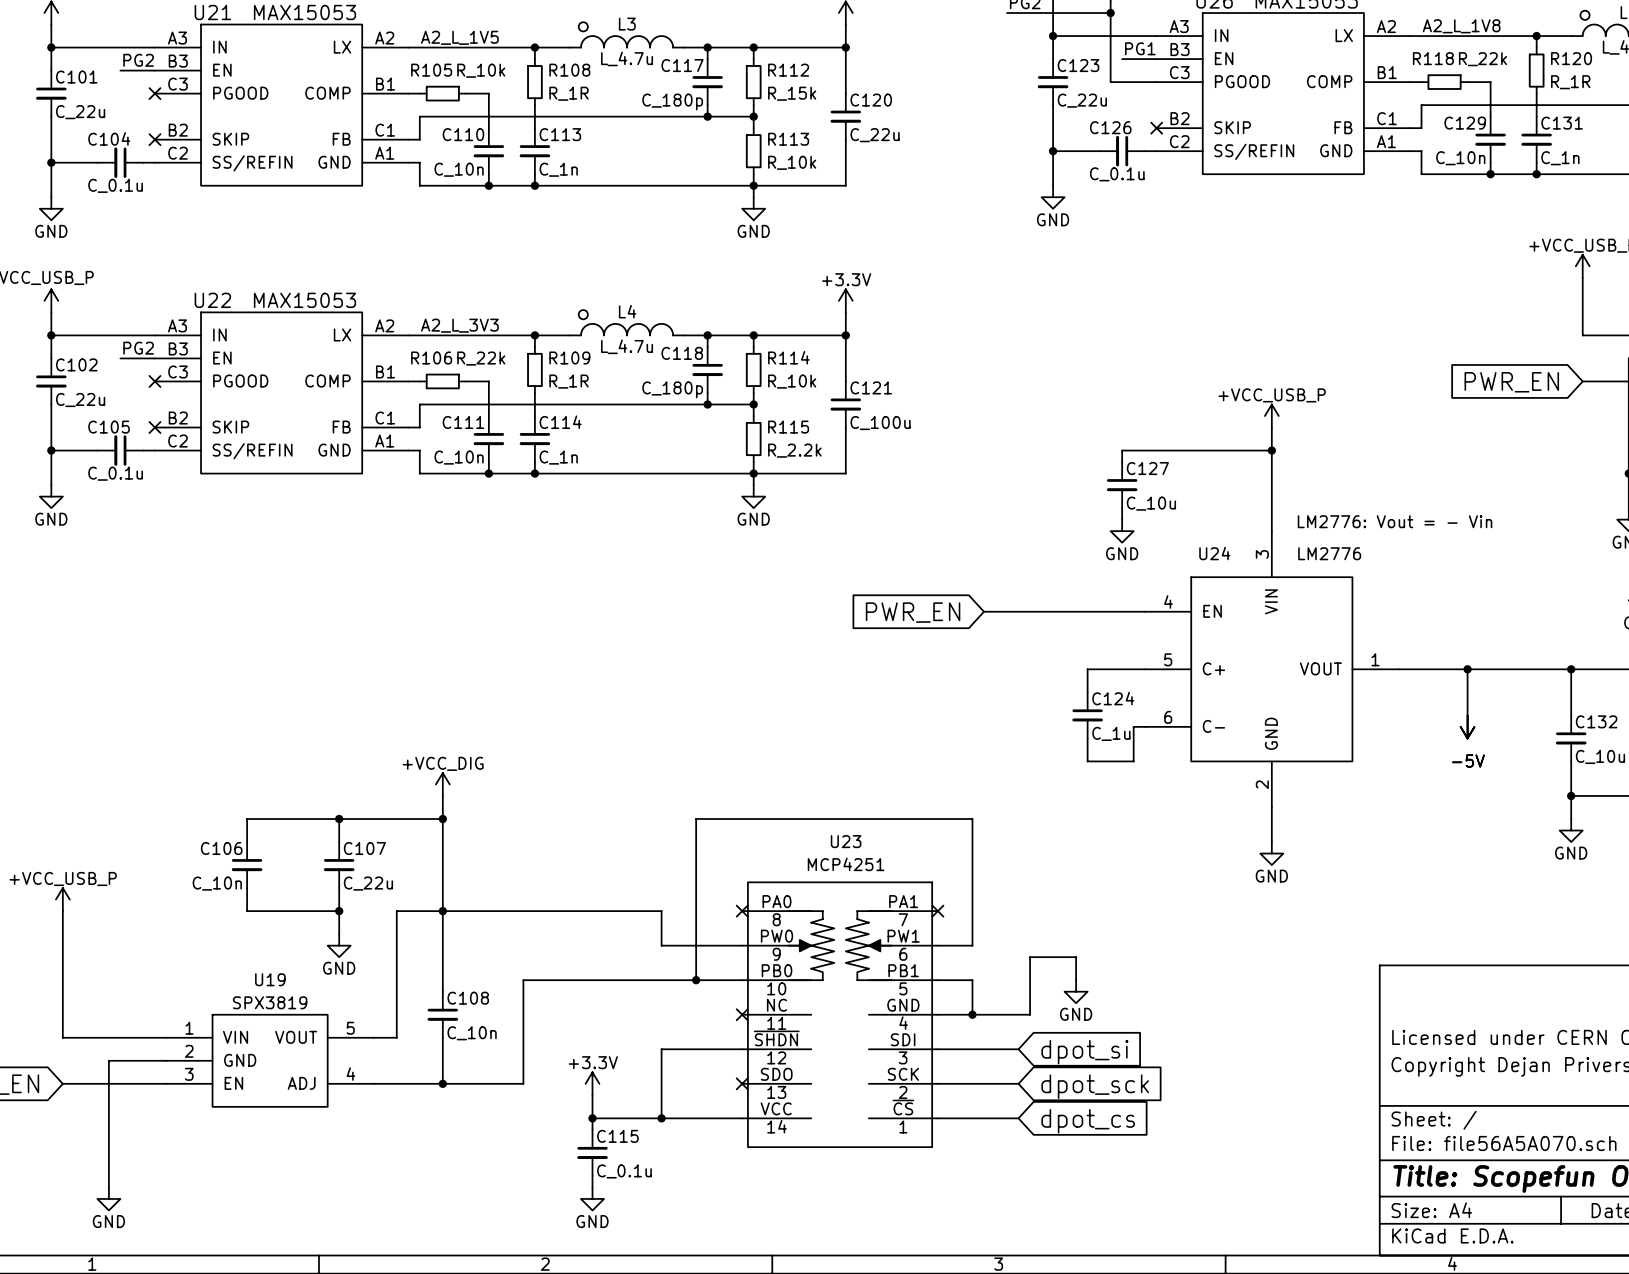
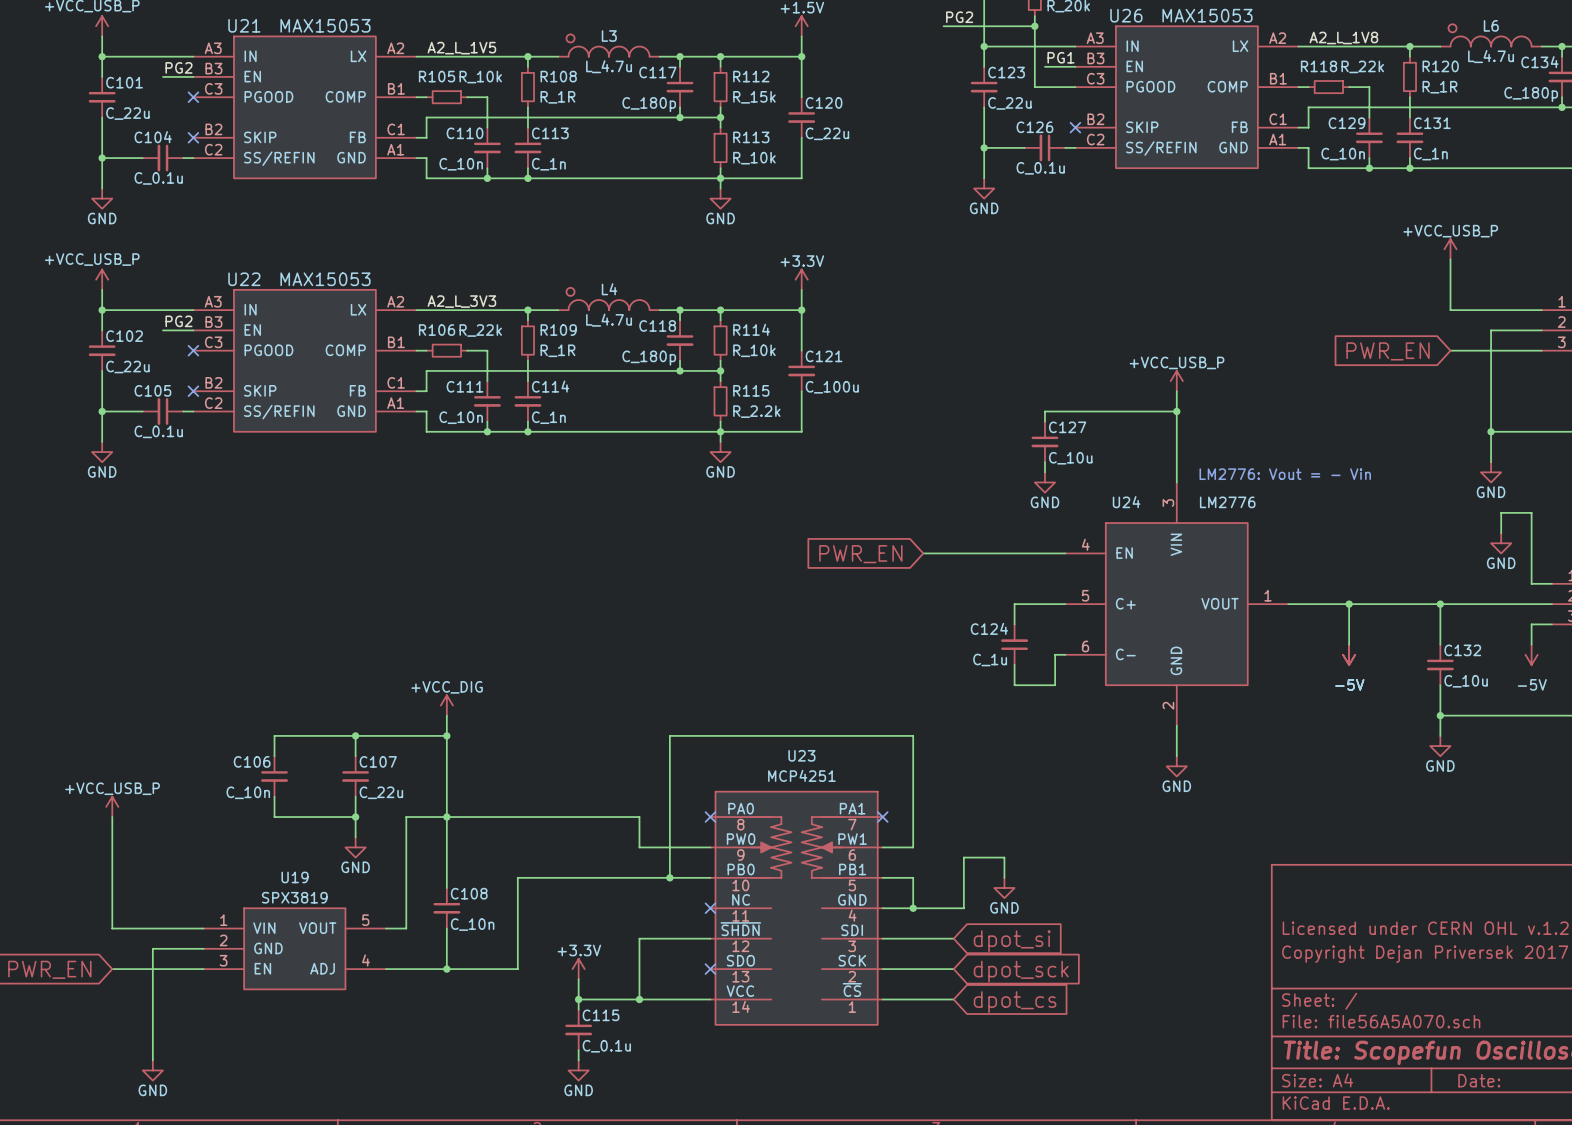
C124 name position: C124 (1113, 698) -> C124 (989, 628)
C124 rotation: 0° (1087, 715) -> 180° (1014, 644)
C124 value position: C_1u (1111, 733) -> C_1u (990, 659)

